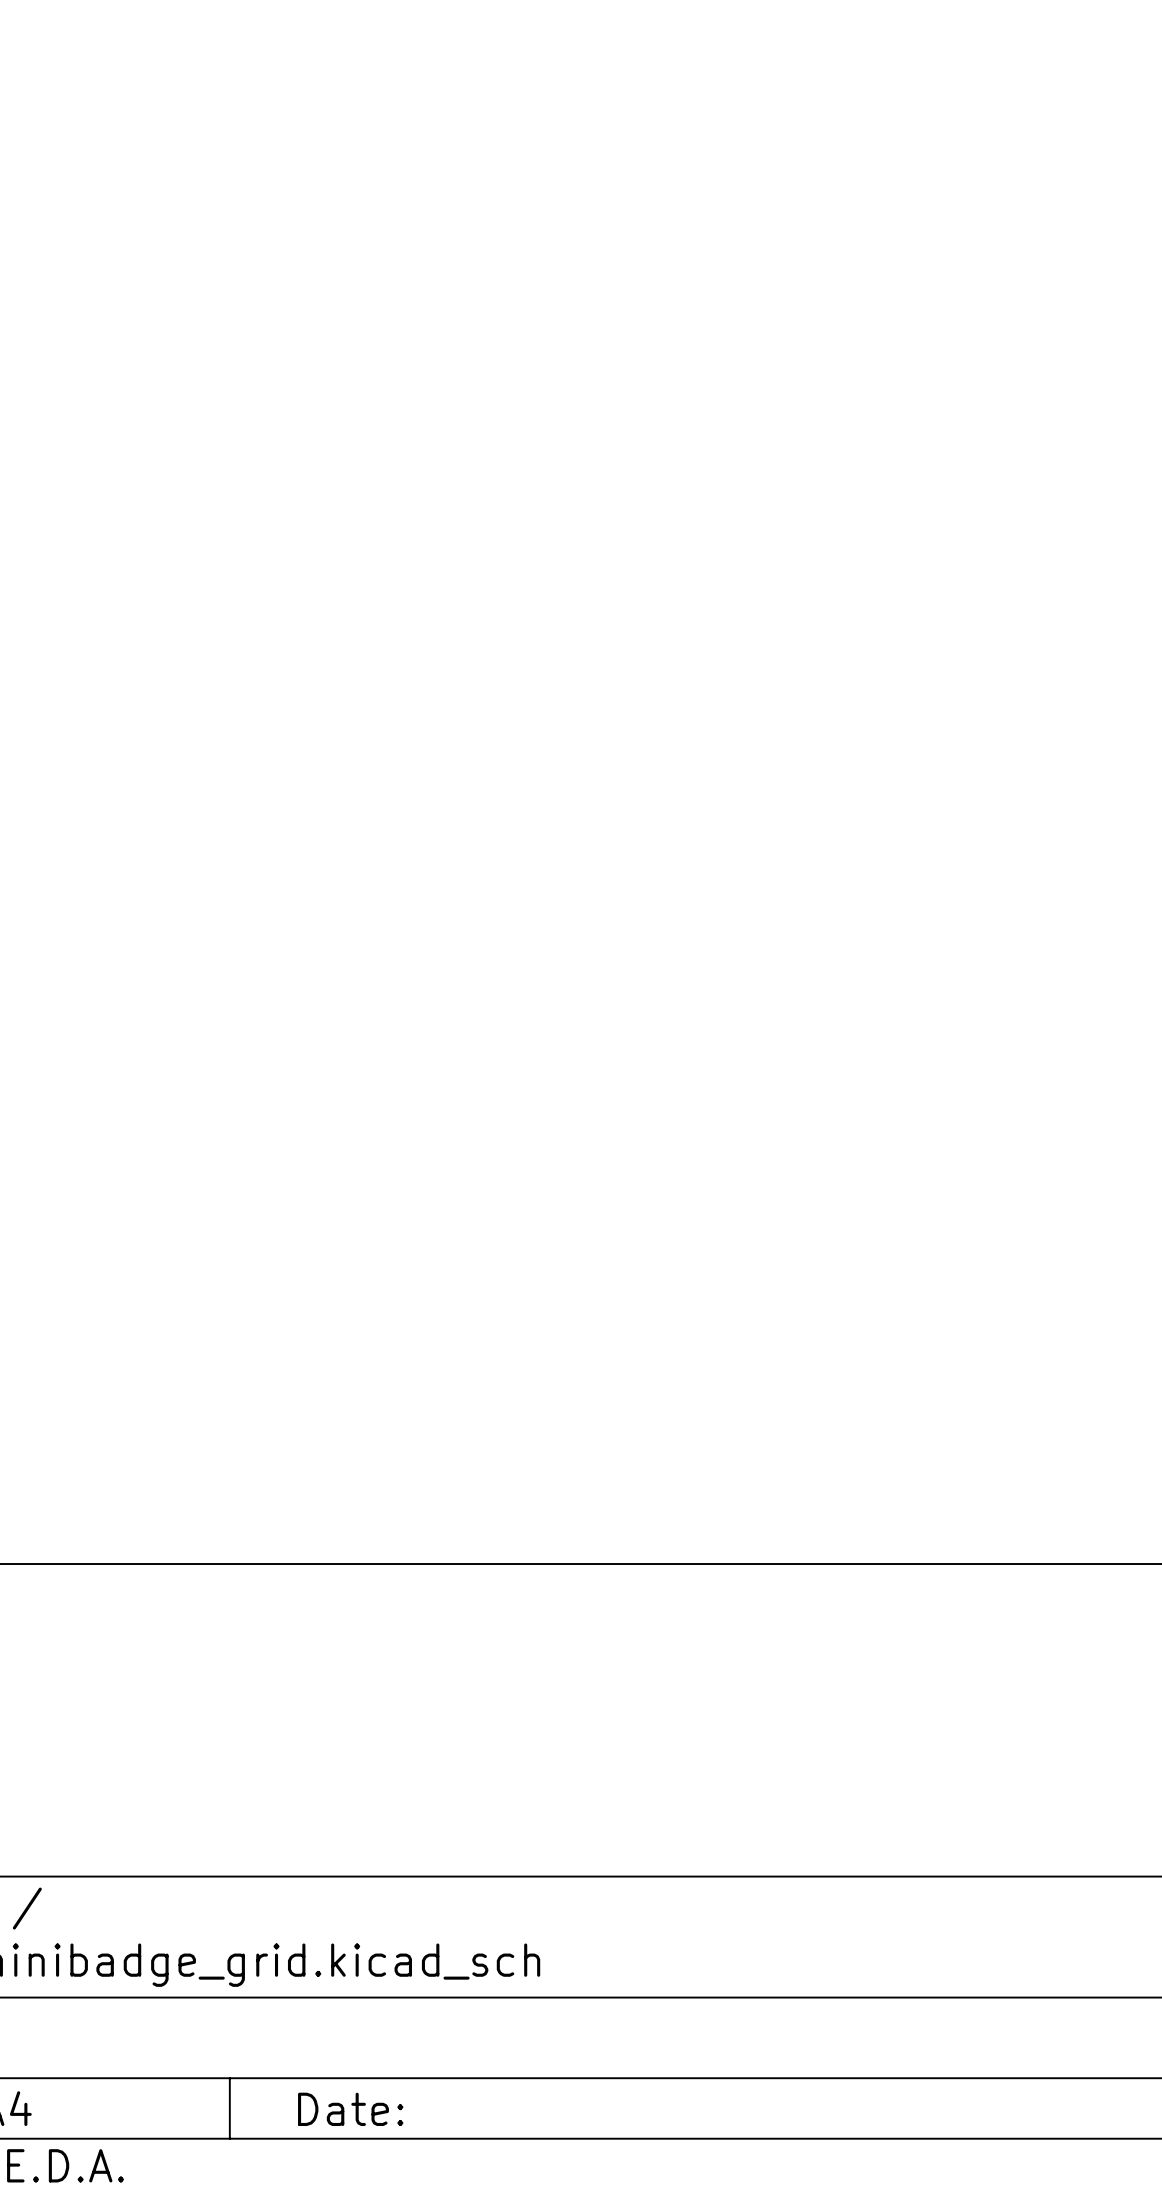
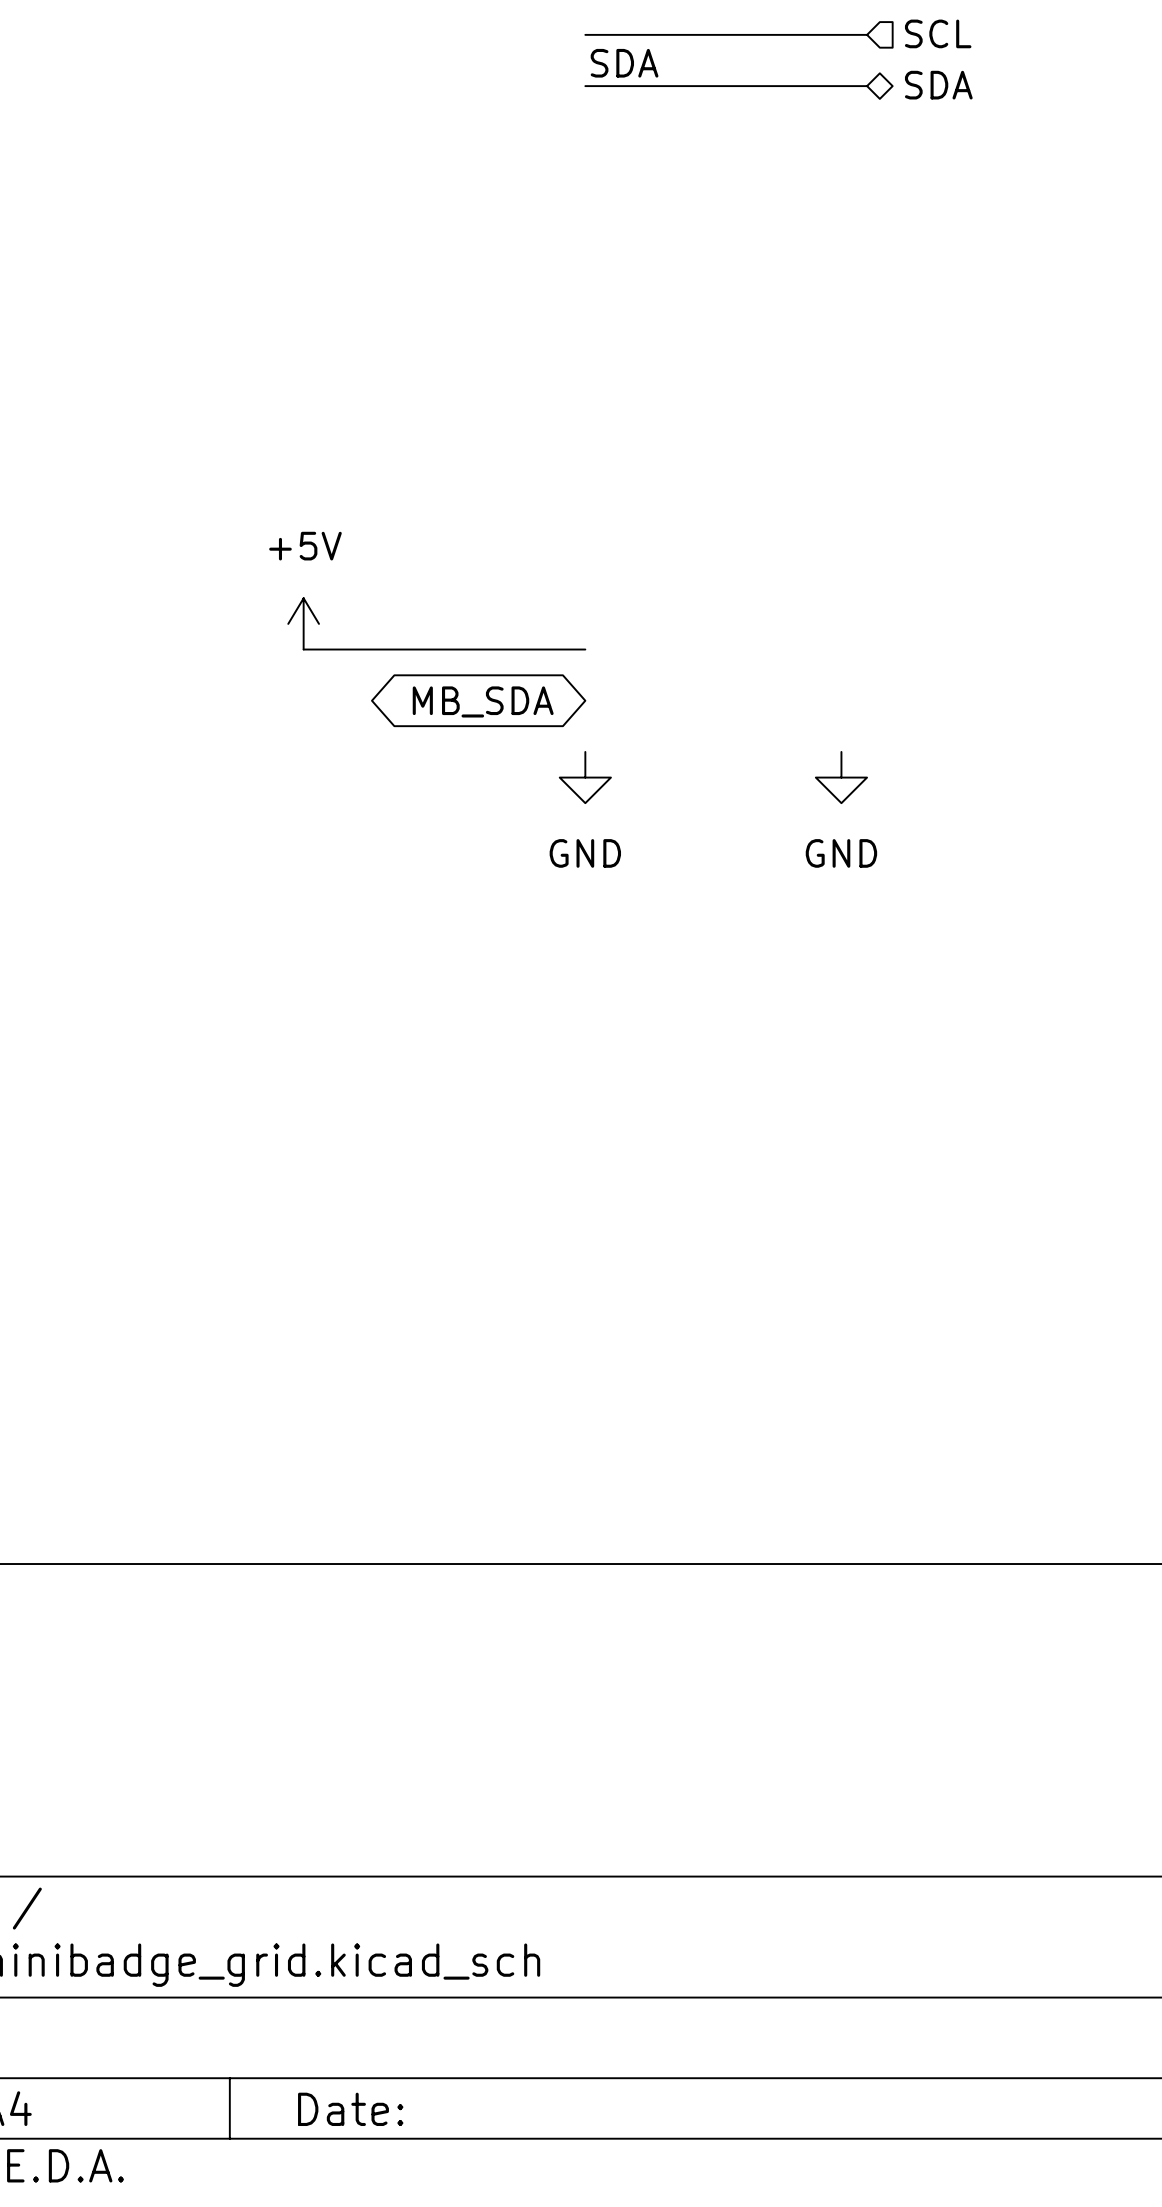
hierarchical label: none -> SCL (938, 33)
wire: none -> (585, 34) (867, 34)
label: none -> SDA (624, 63)
hierarchical label: none -> SDA (938, 85)
wire: none -> (585, 86) (867, 86)
power symbol: none -> +5V (303, 623)
wire: none -> (303, 649) (585, 649)
global label: none -> MB_SDA (483, 701)
power symbol: none -> GND (585, 777)
power symbol: none -> GND (841, 777)

